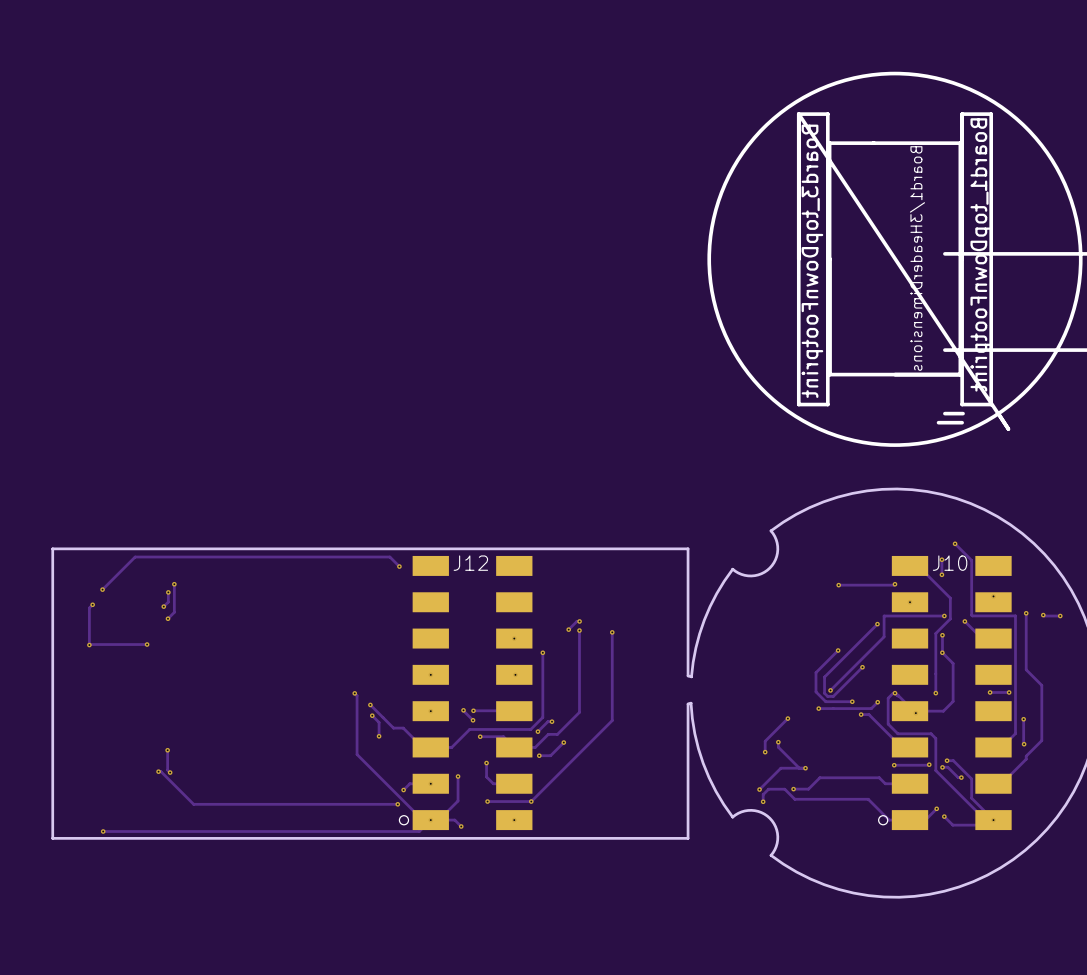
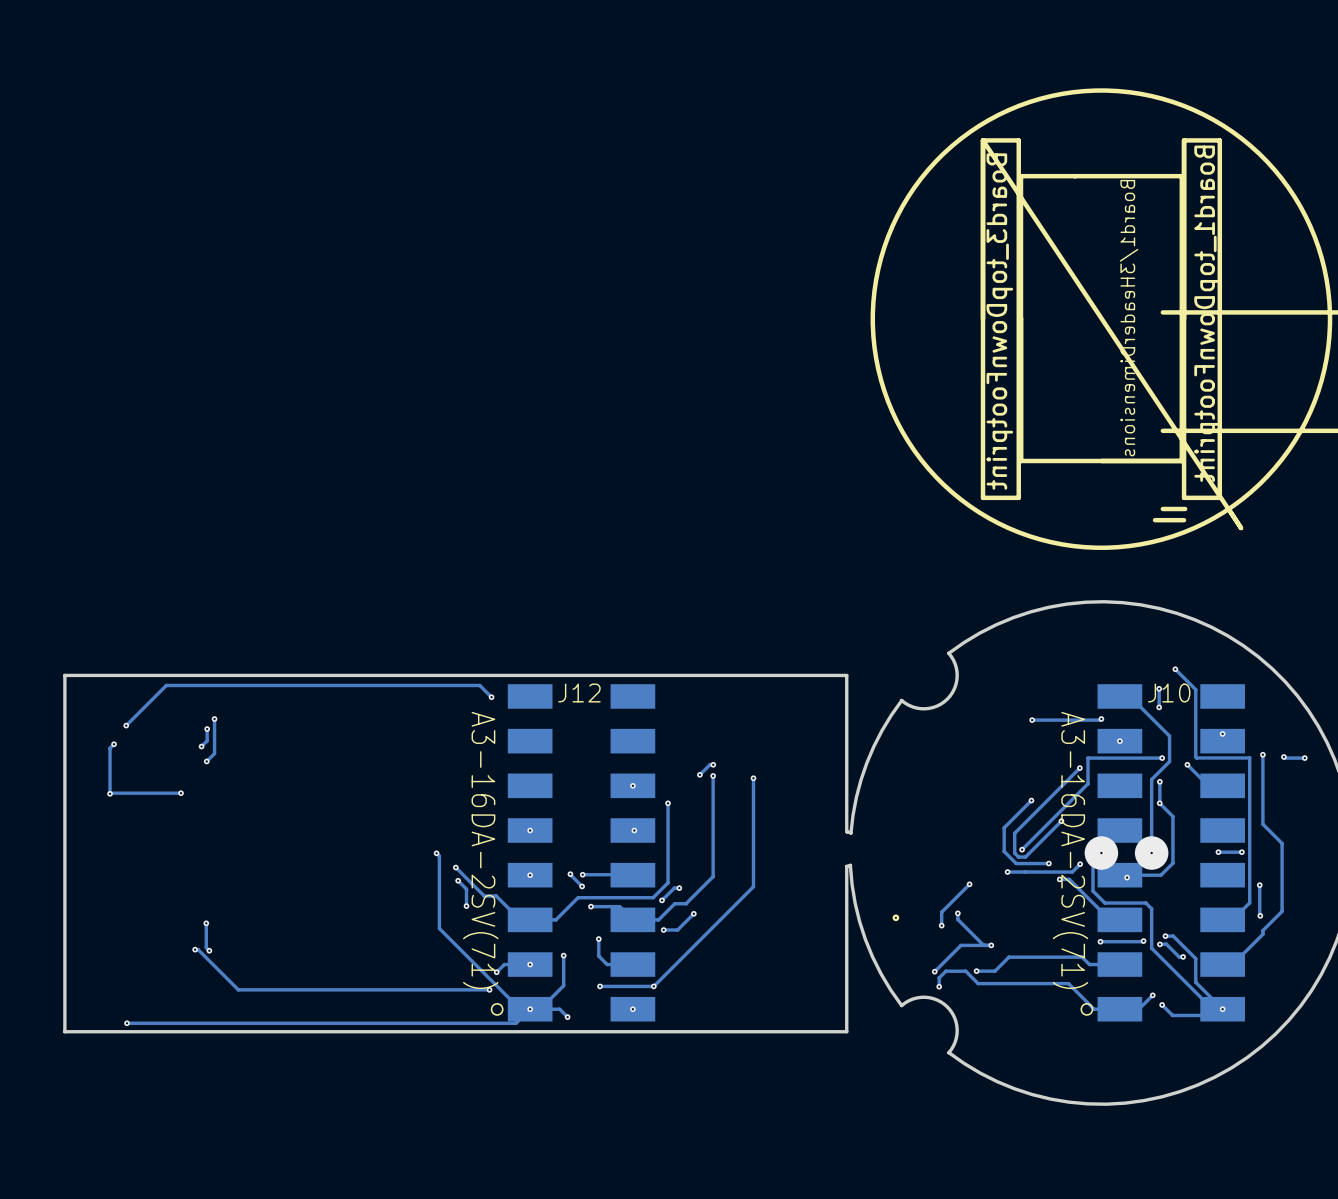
via size: [892, 690, 898, 696] -> [1084, 836, 1119, 870]
via size: [933, 690, 939, 696] -> [1134, 836, 1169, 870]
J12 value: none -> A3-16DA-2SV(71) (480, 850)
J10 value: none -> A3-16DA-2SV(71) (1070, 850)
drawing: none -> [892, 914, 900, 922]

